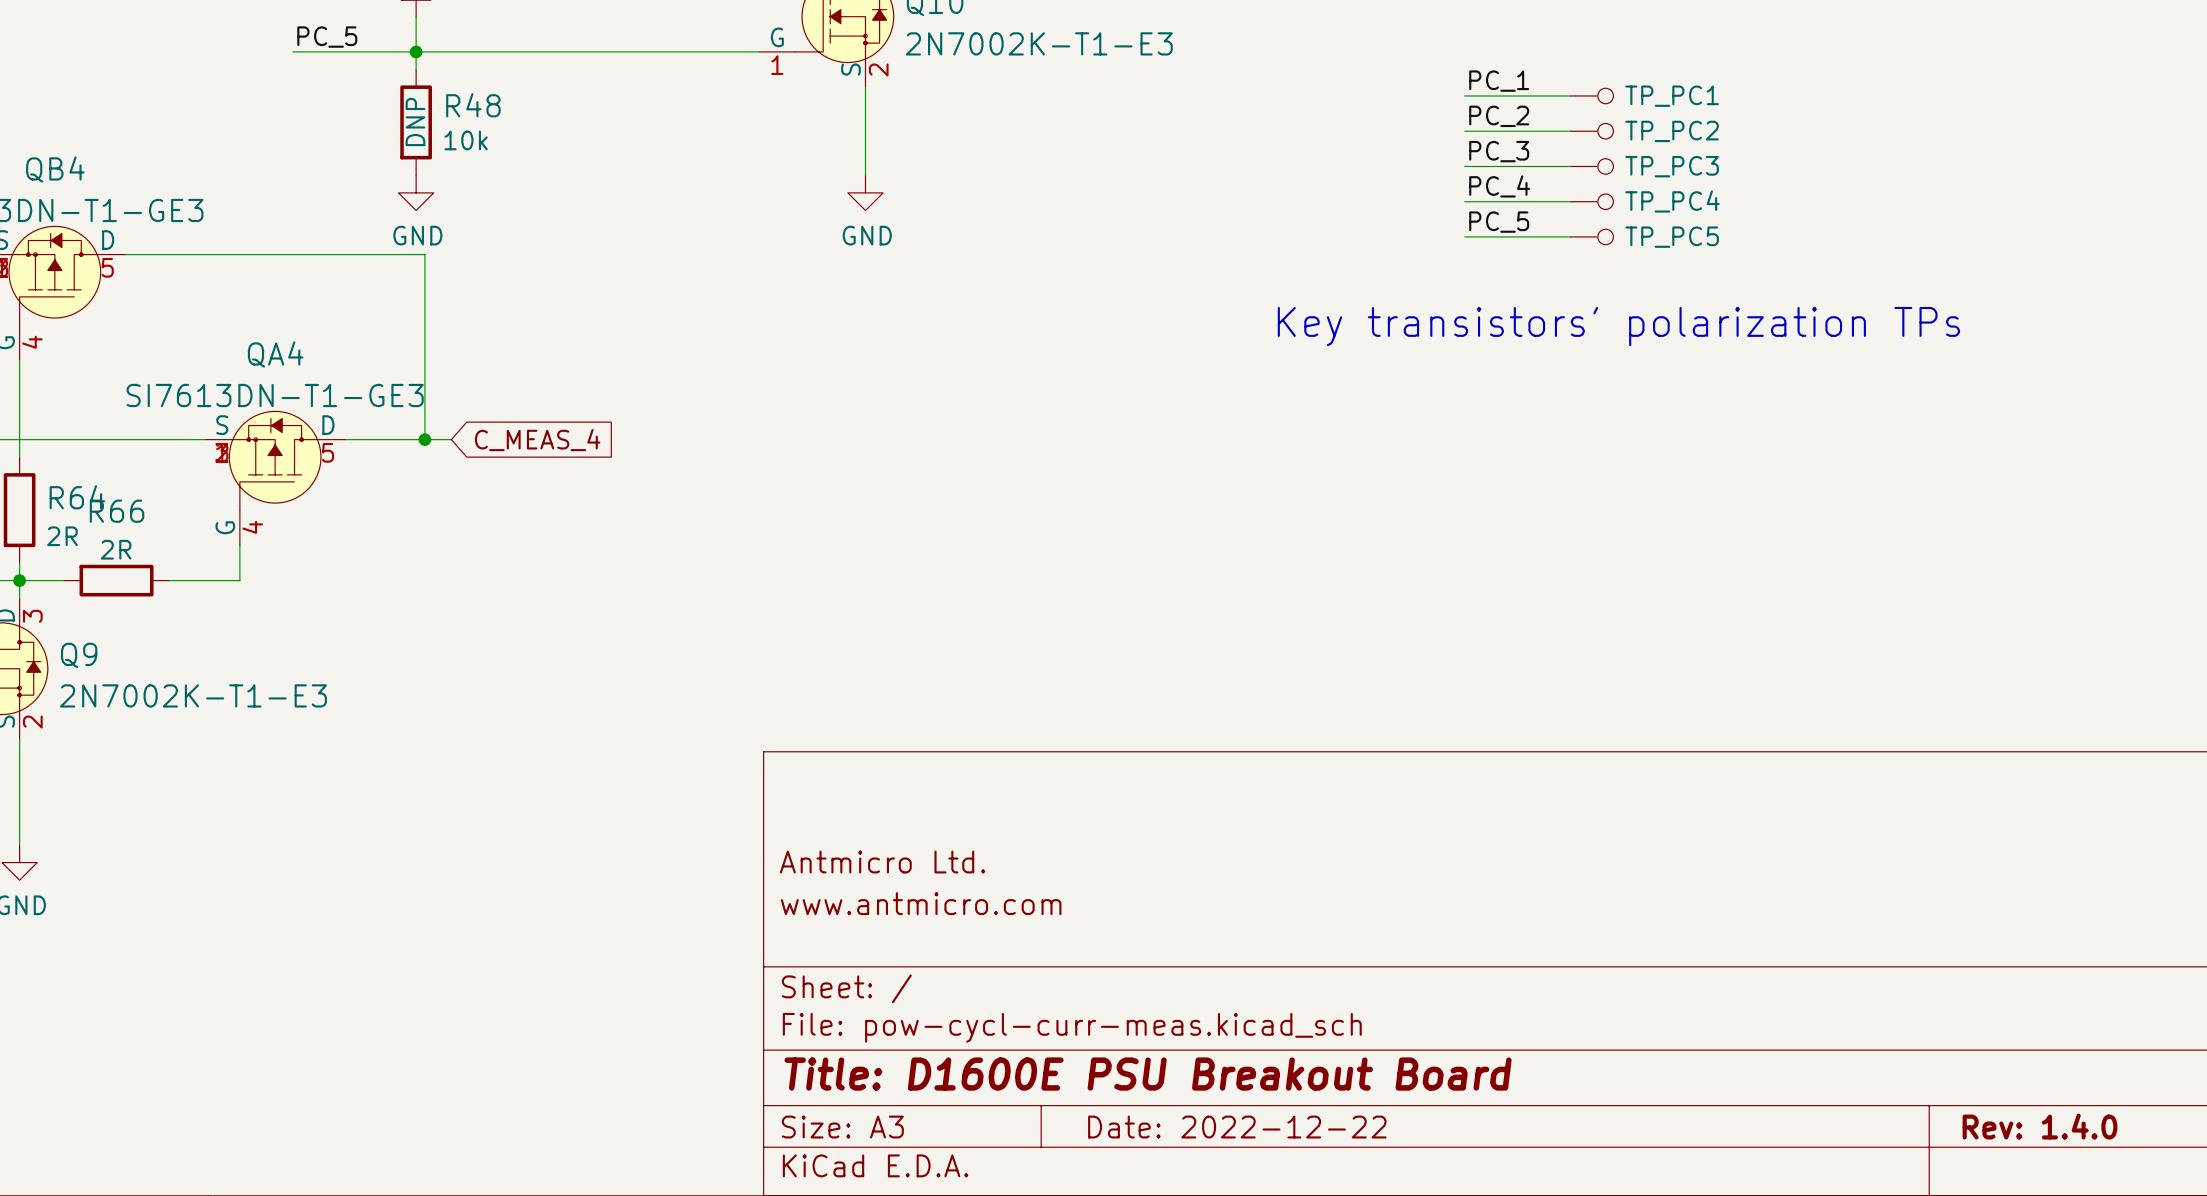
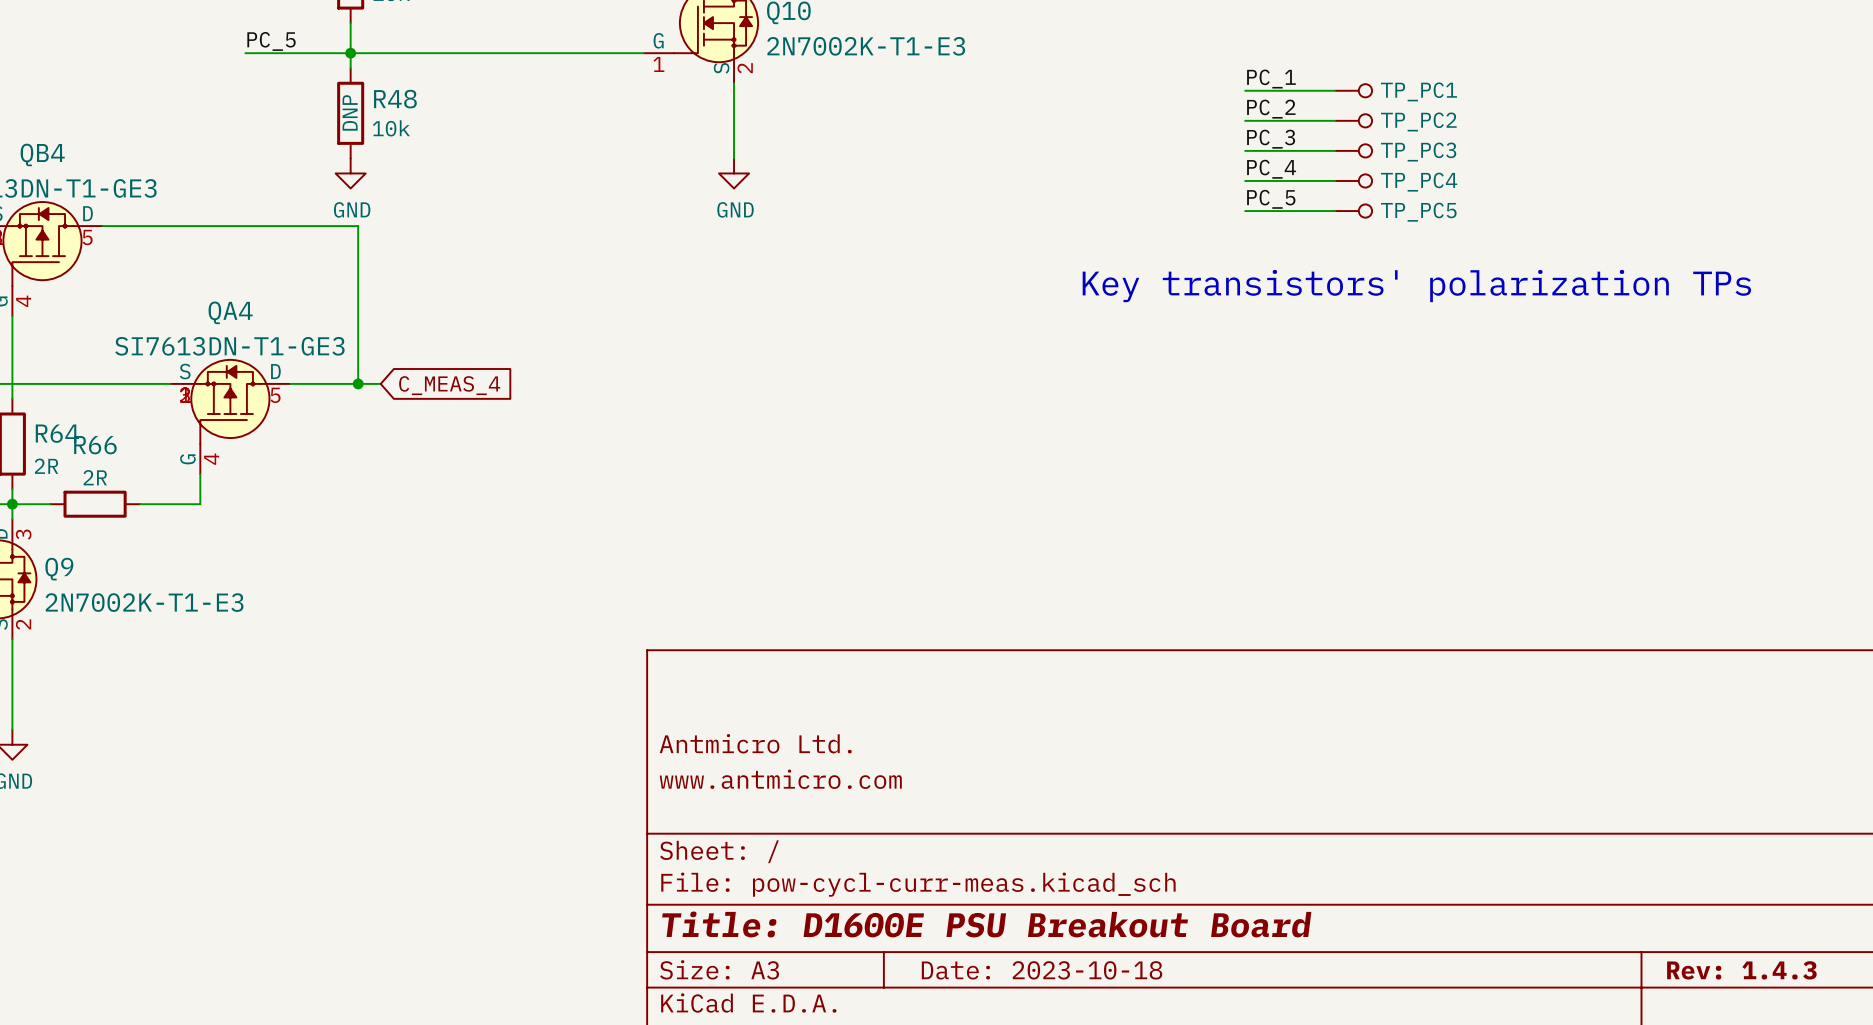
title block: Rev: 1.4.0 (2040, 1126) -> Rev: 1.4.3 (1741, 970)
title block: Date: 2022-12-22 (1237, 1127) -> Date: 2023-10-18 (1042, 970)

